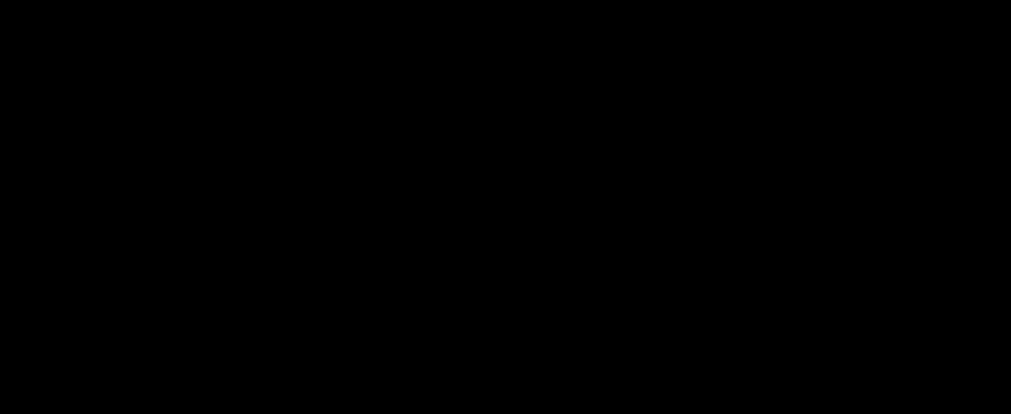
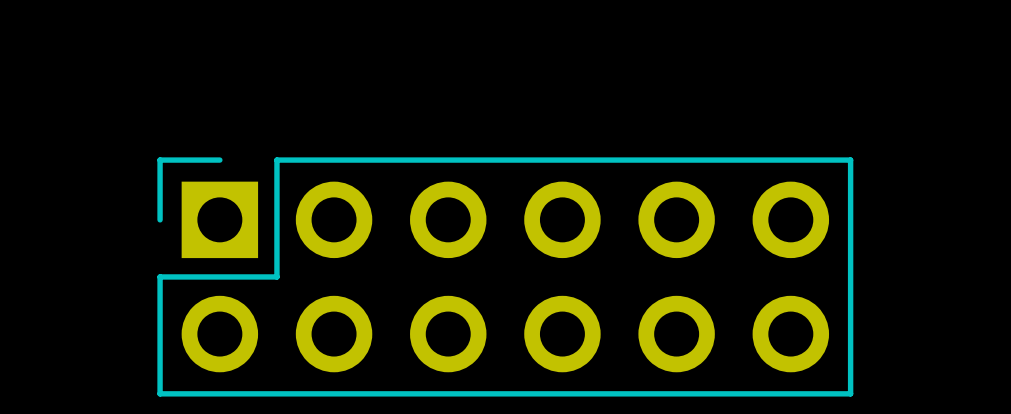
part: none -> (505, 276)

